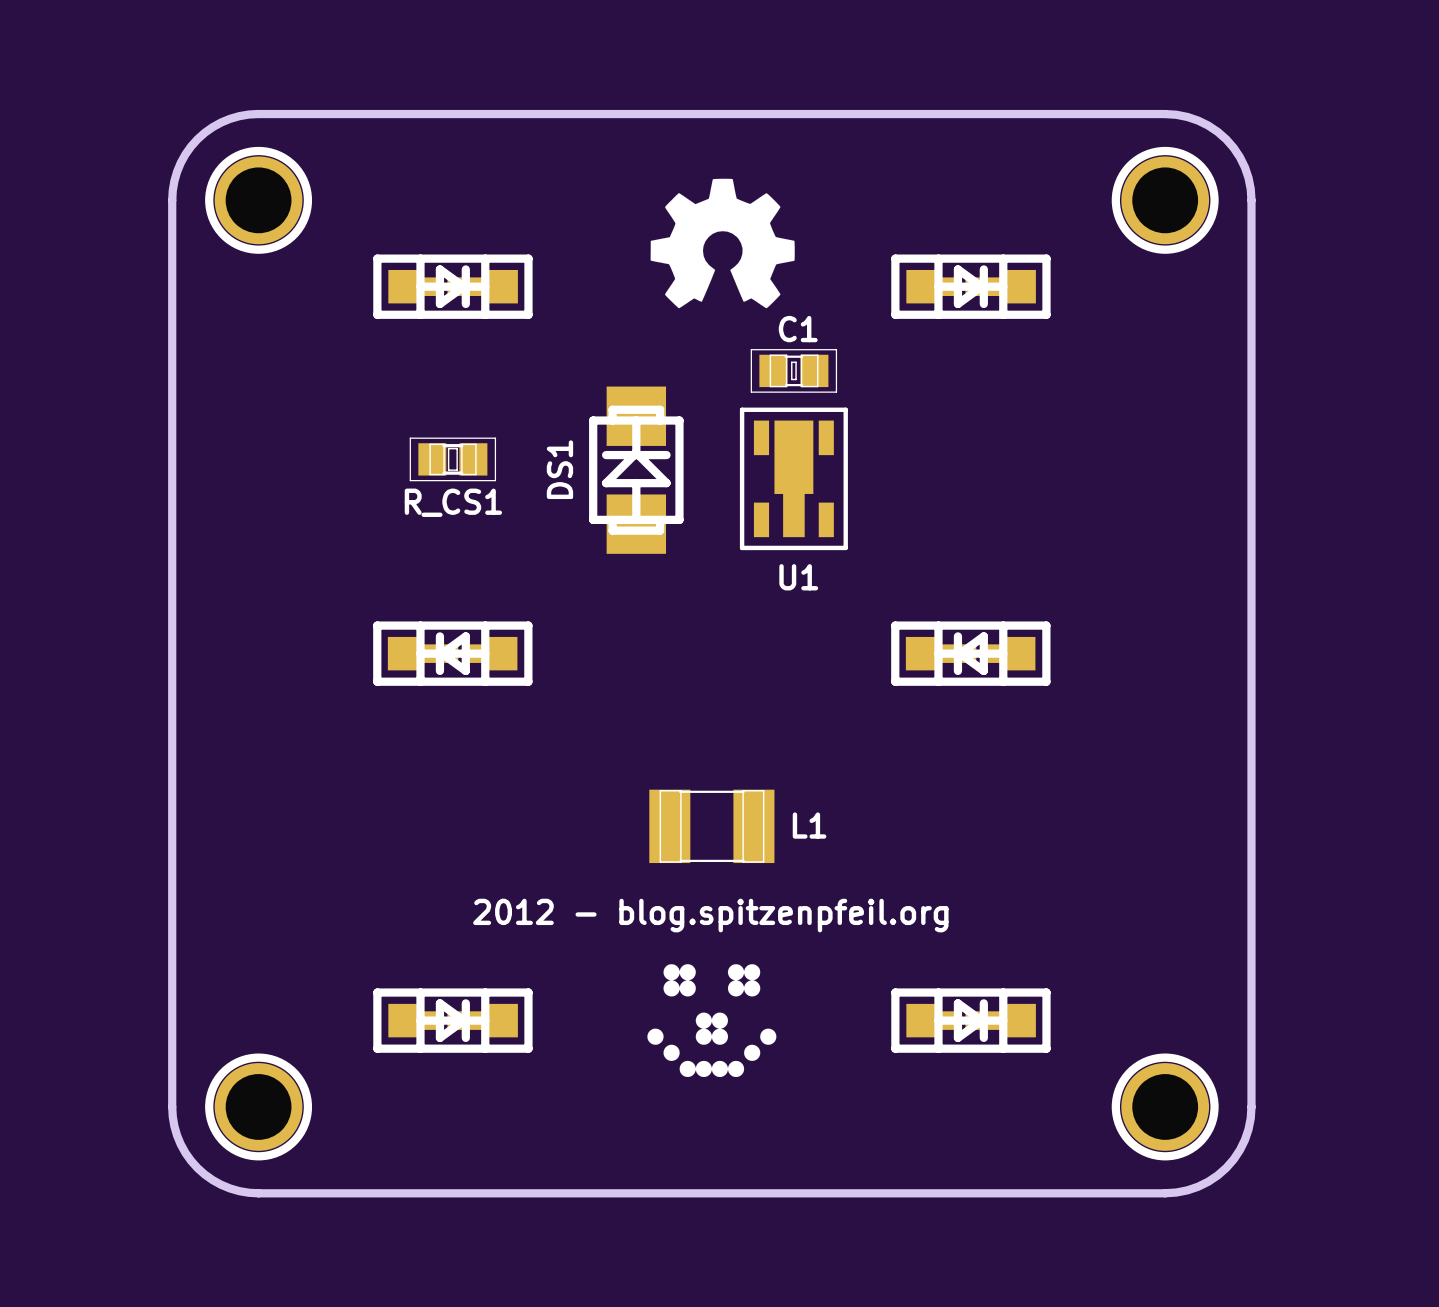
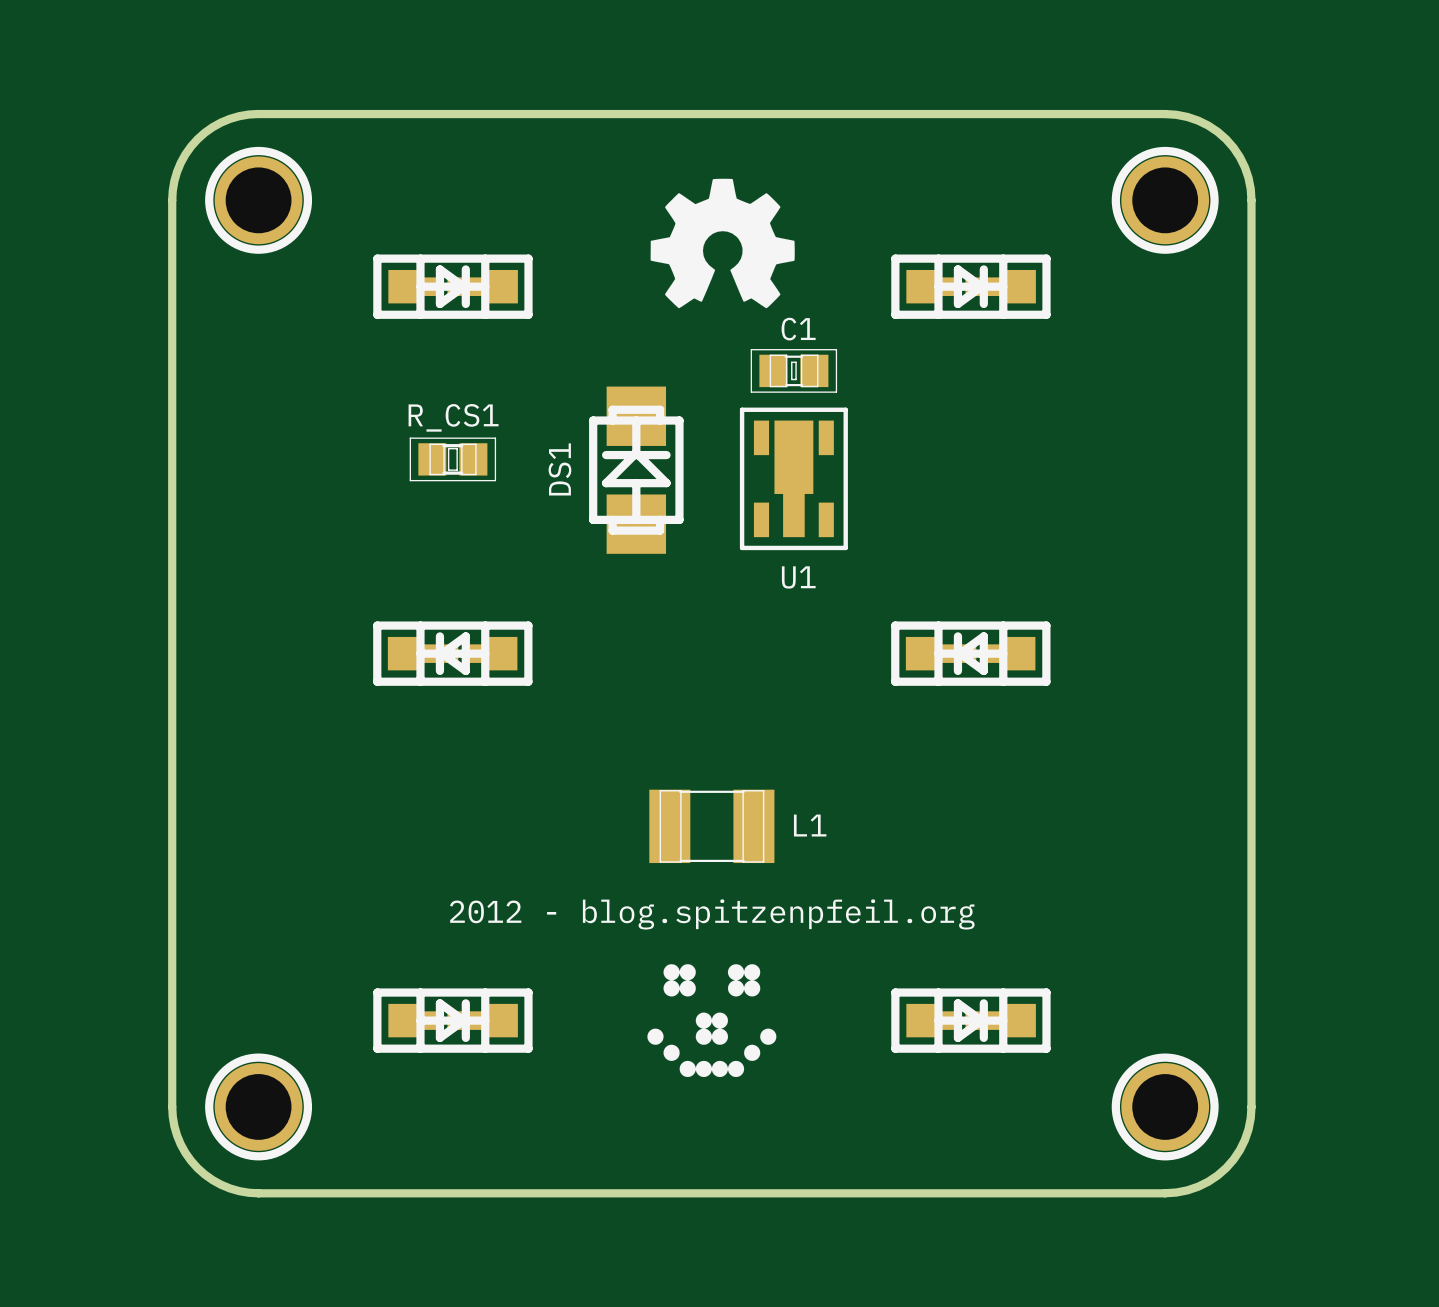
R_CS1 name position: R_CS1 (453, 502) -> R_CS1 (453, 417)

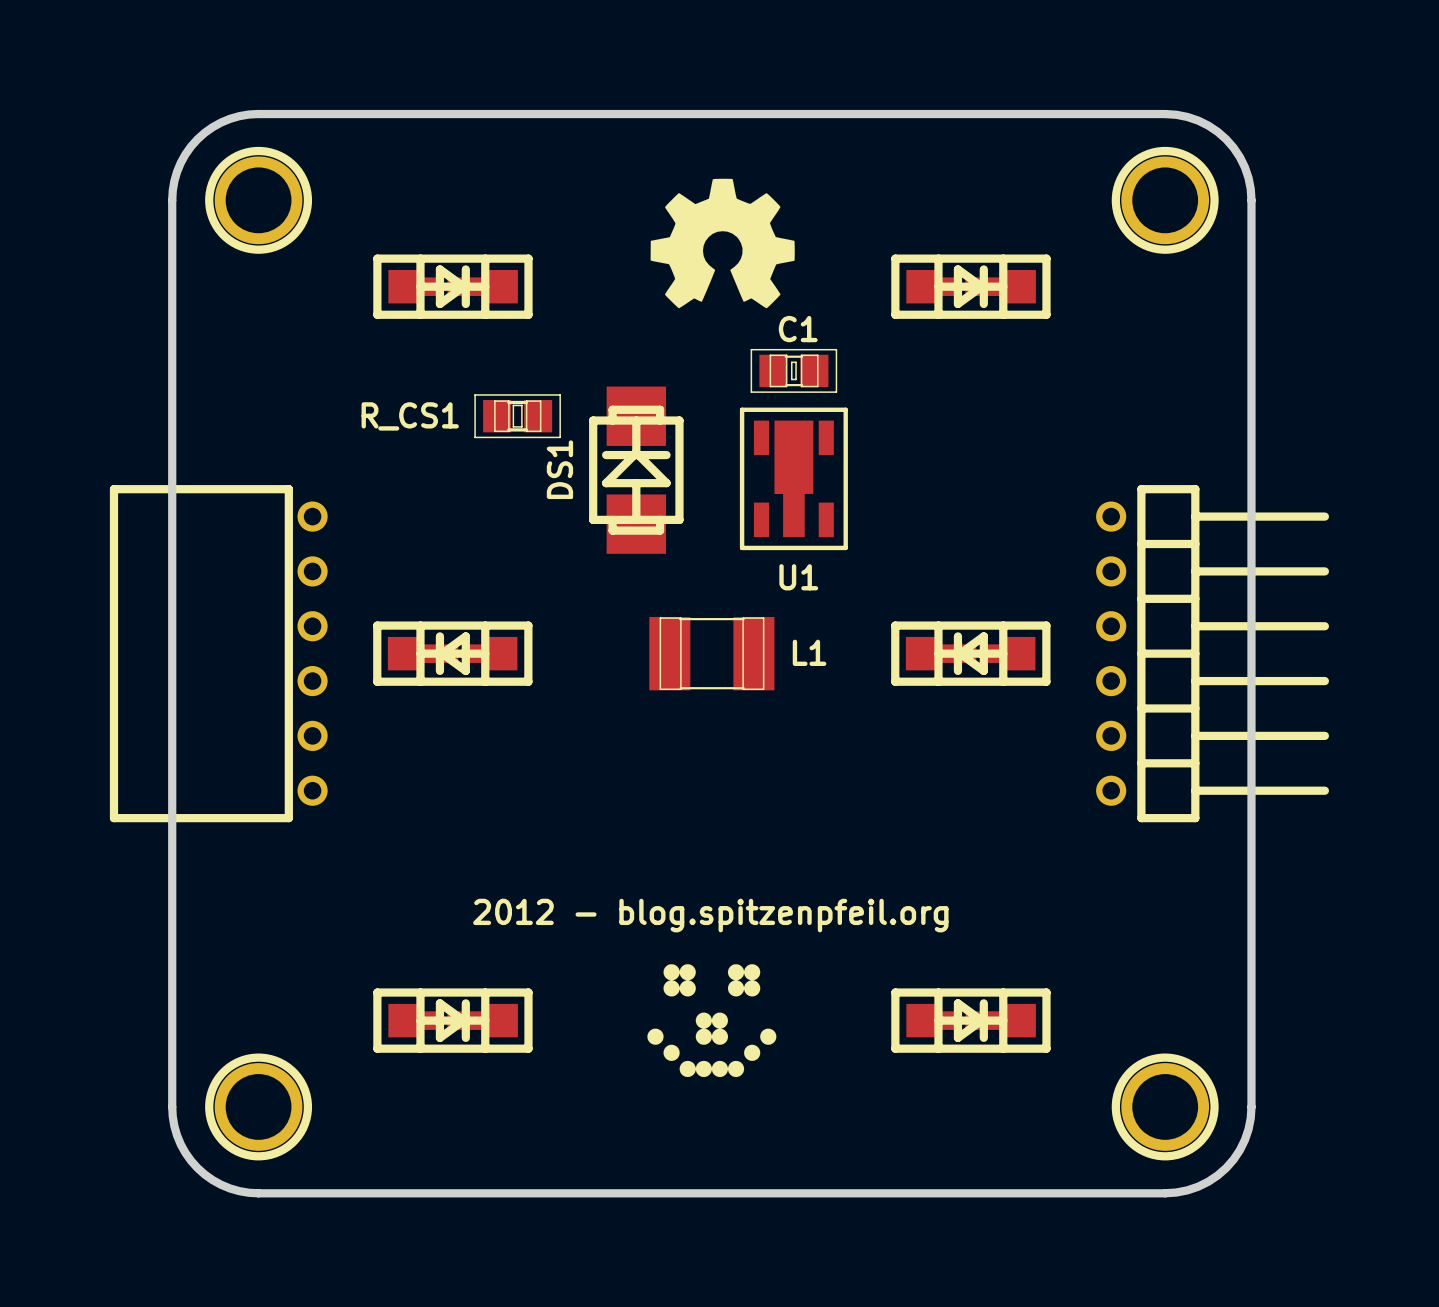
R_CS1 name position: R_CS1 (453, 417) -> R_CS1 (410, 416)
R_CS1 position: (452, 459) -> (517, 416)
part: none -> (218, 653)
part: none -> (1212, 653)
L1 position: (711, 826) -> (711, 653)

